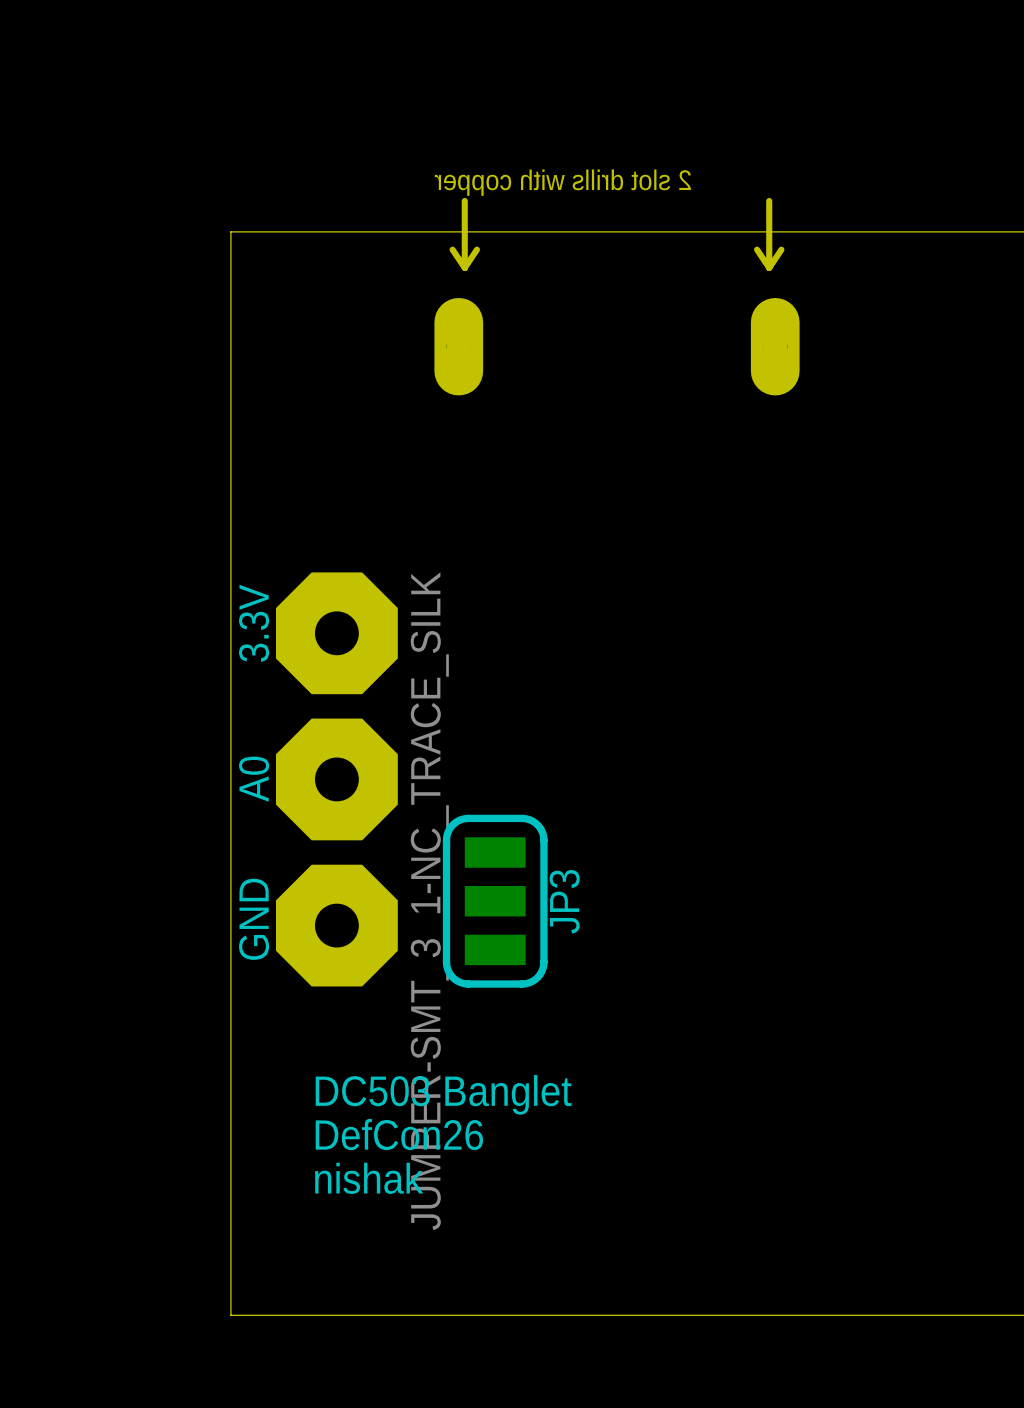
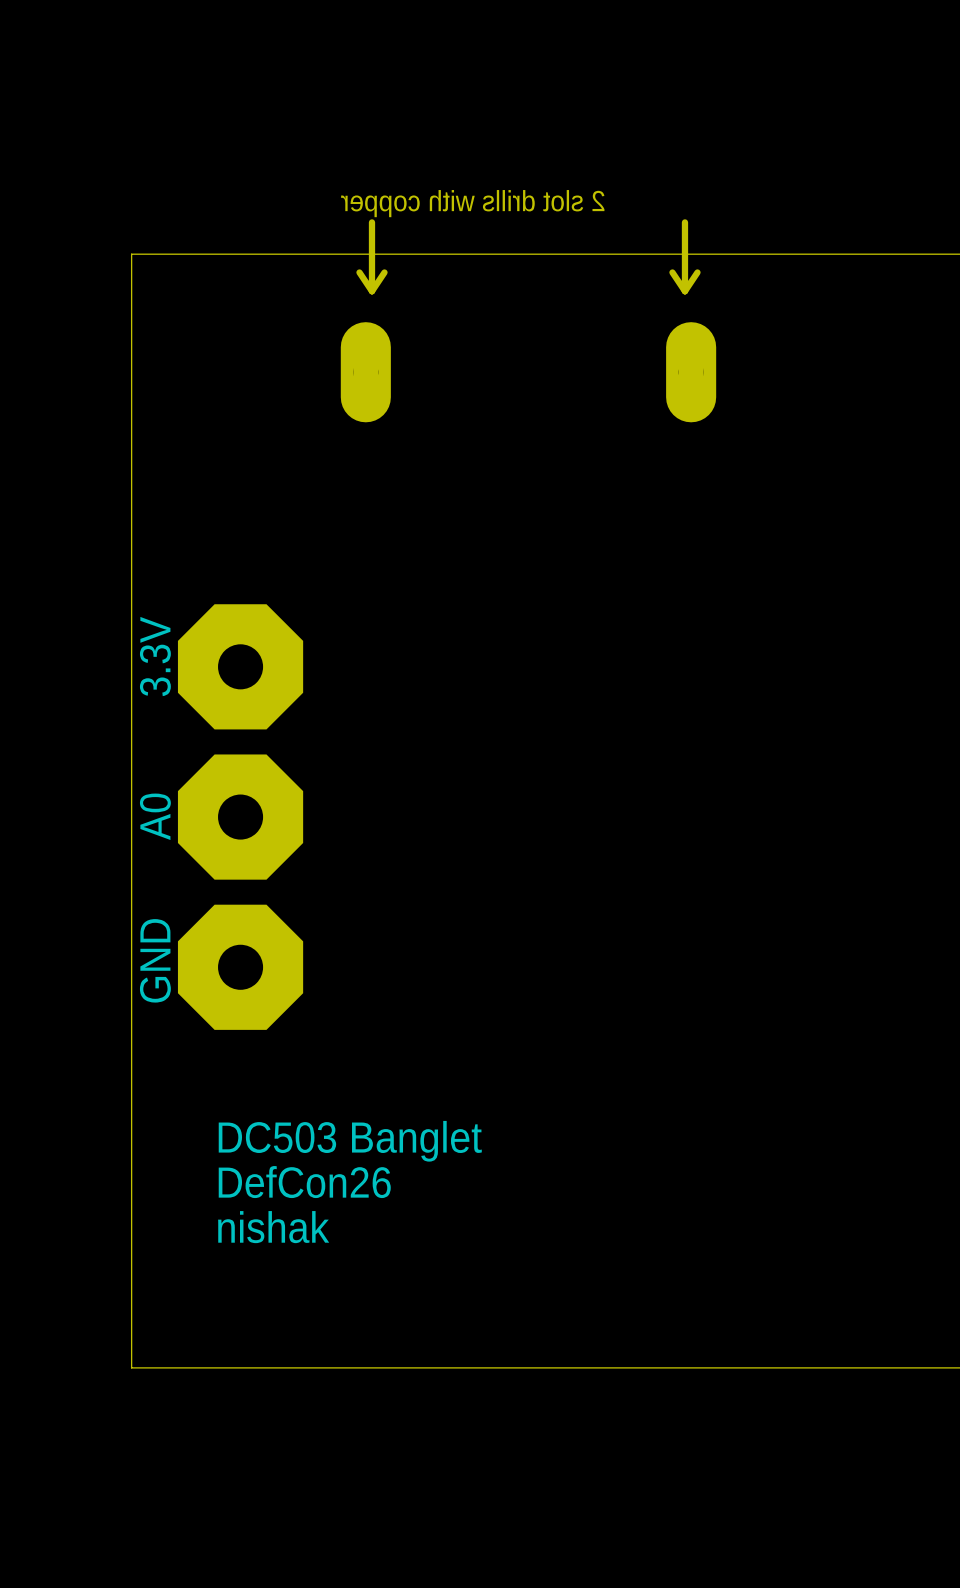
JP3: JUMPER-SMT_3_1-NC_TRACE_SILK (495, 901) -> none

